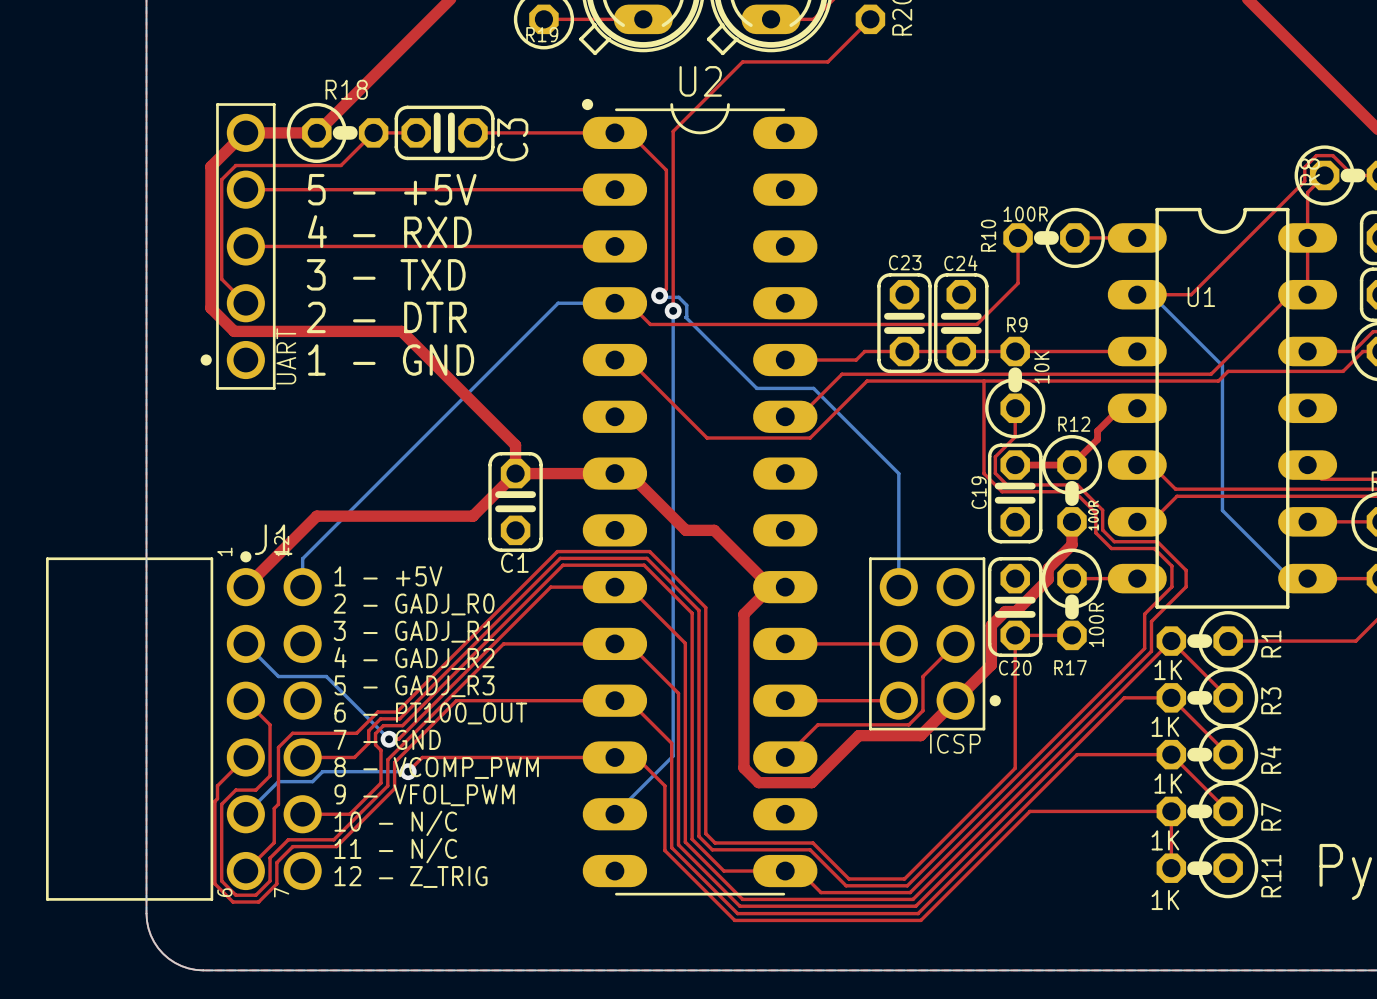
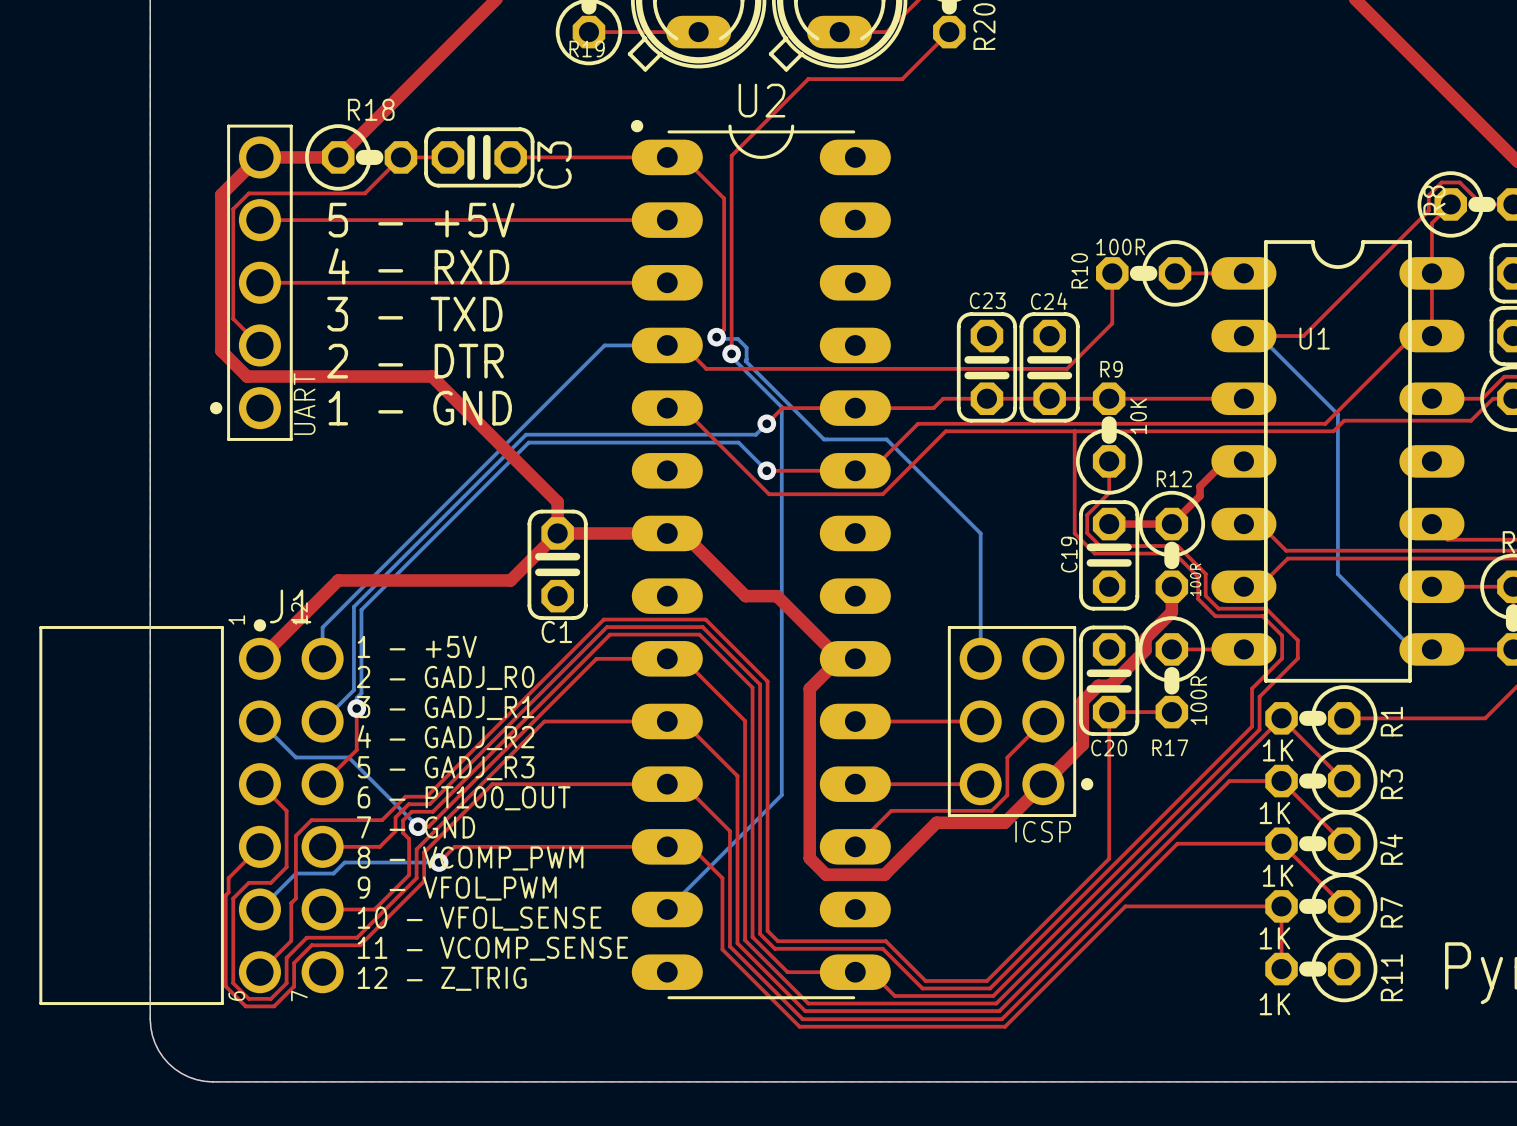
bottom track: (673, 313) (673, 755) -> (731, 357) (781, 407) (781, 795) (731, 845)
top track: none -> (855, 408) (782, 408) (766, 423)
bottom track: none -> (766, 423) (755, 434) (526, 434) (353, 606) (353, 690) (322, 721)
via: none -> (766, 423)
bottom track: none -> (766, 470) (738, 442) (528, 442) (361, 609) (361, 693) (356, 698) (356, 708)
via: none -> (766, 470)
top track: none -> (356, 708) (356, 750) (322, 784)
via: none -> (356, 708)
text: 10 - N/C (395, 823) -> 10 - VFOL_SENSE (479, 918)
text: 11 - N/C (395, 850) -> 11 - VCOMP_SENSE (492, 948)

